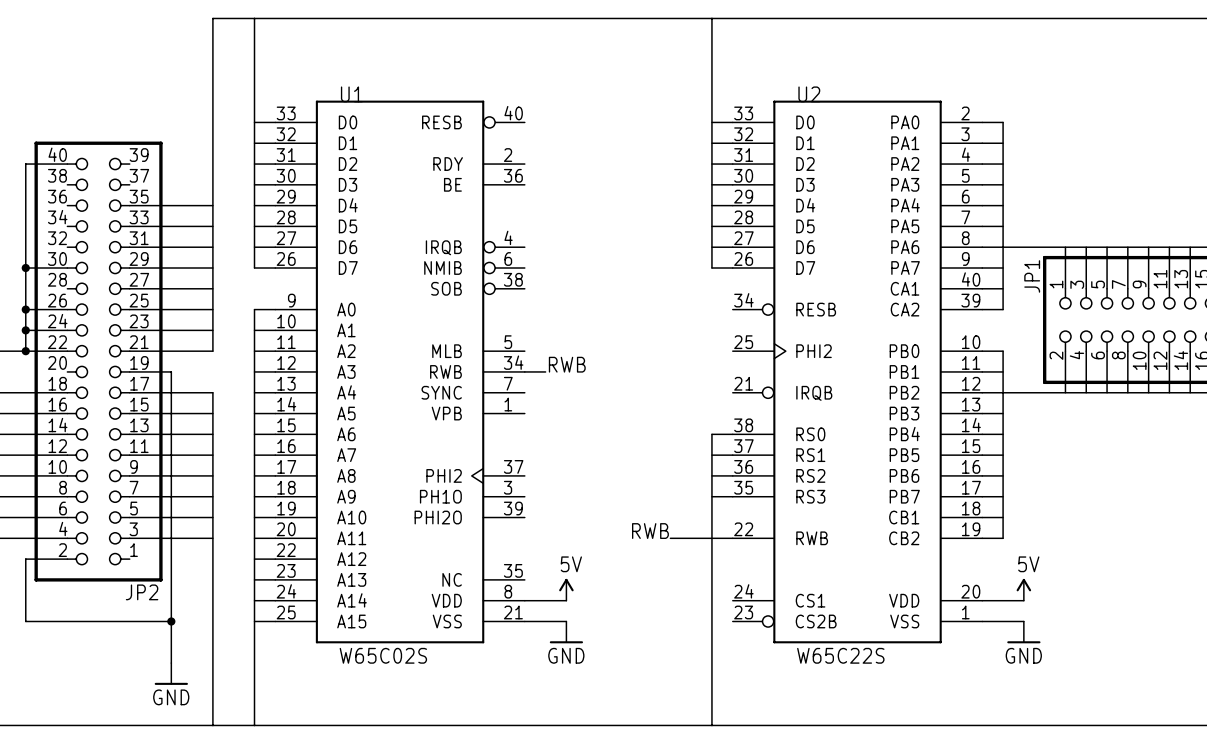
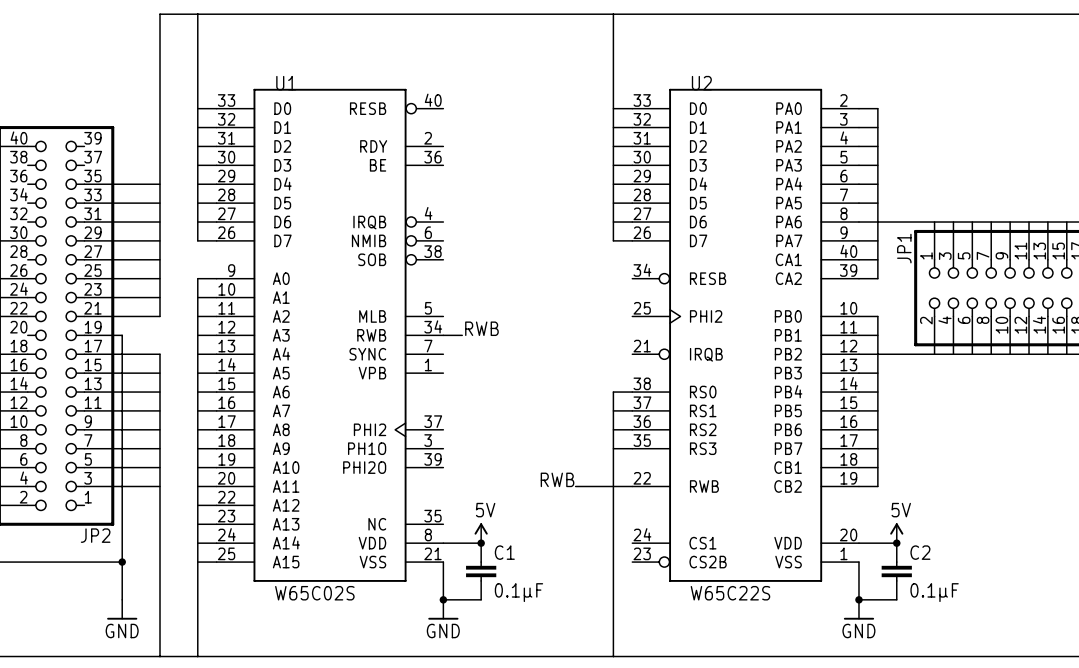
junction: none -> (481, 543)
junction: none -> (896, 543)
wire: (524, 621) (566, 621) -> (443, 562) (443, 599) (481, 599)
wire: (982, 621) (1023, 621) -> (858, 562) (858, 599) (896, 599)
C1: none -> 0.1μF (481, 571)
C2: none -> 0.1μF (896, 571)
power symbol position: GND (566, 632) -> GND (443, 609)
power symbol position: GND (1023, 632) -> GND (858, 609)
junction: none -> (443, 599)
junction: none -> (858, 599)

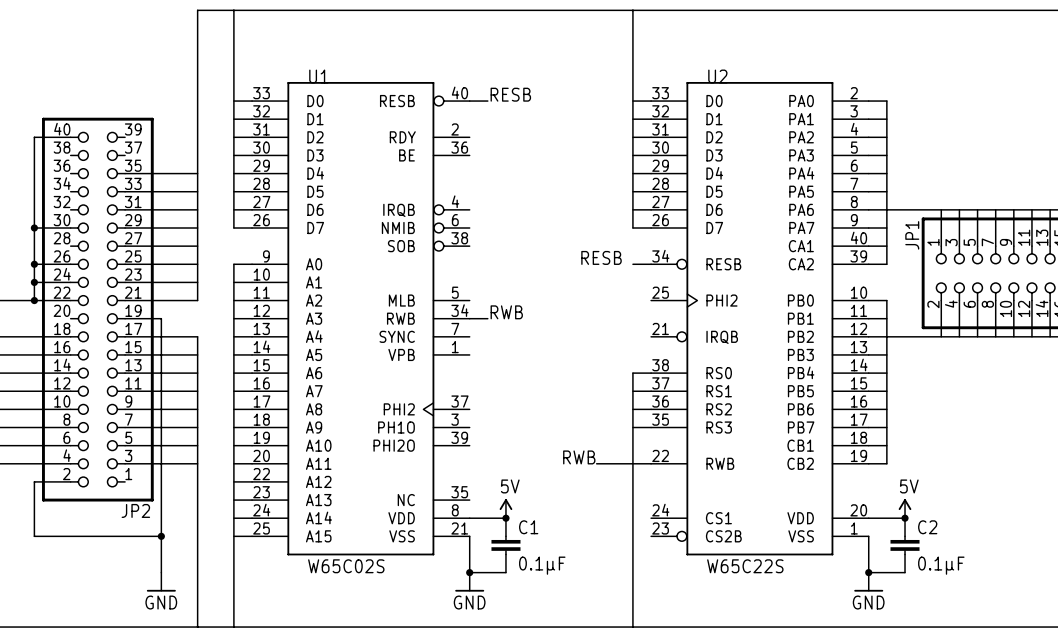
label: none -> RESB (510, 94)
wire: none -> (469, 101) (487, 101)
label: none -> RESB (601, 257)
wire: none -> (632, 264) (651, 264)

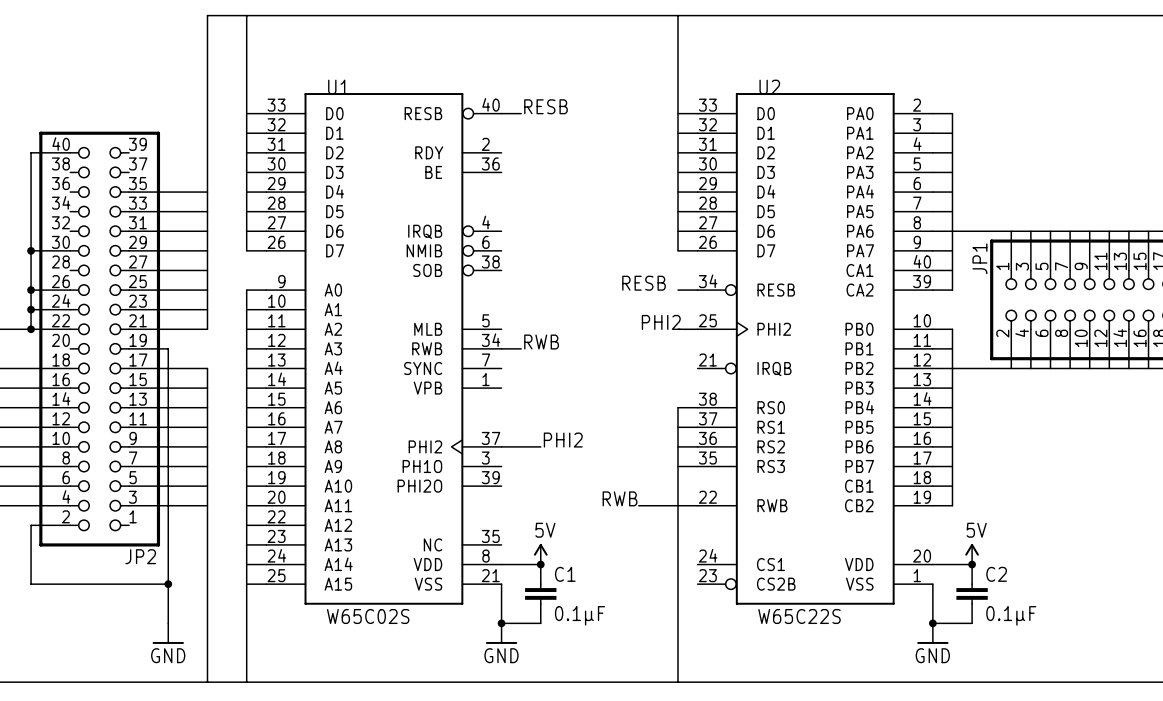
label: none -> PHI2 (661, 322)
wire: none -> (678, 329) (697, 329)
label: none -> PHI2 (563, 440)
wire: none -> (501, 446) (540, 446)

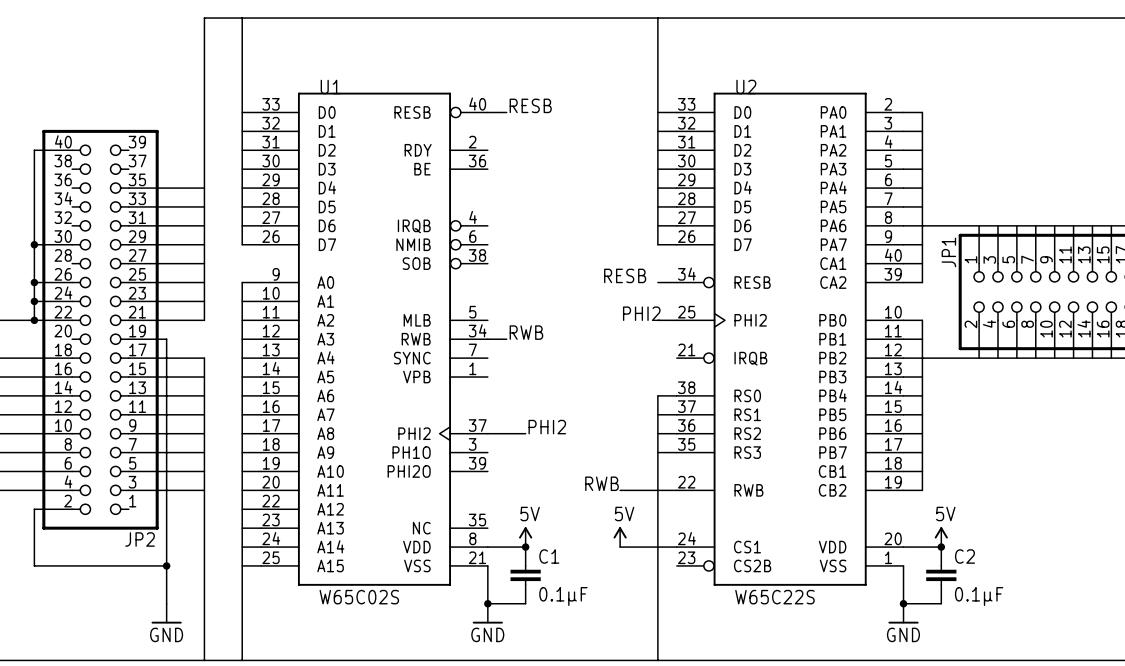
power symbol: none -> 5V (620, 537)
wire: none -> (620, 547) (676, 547)

